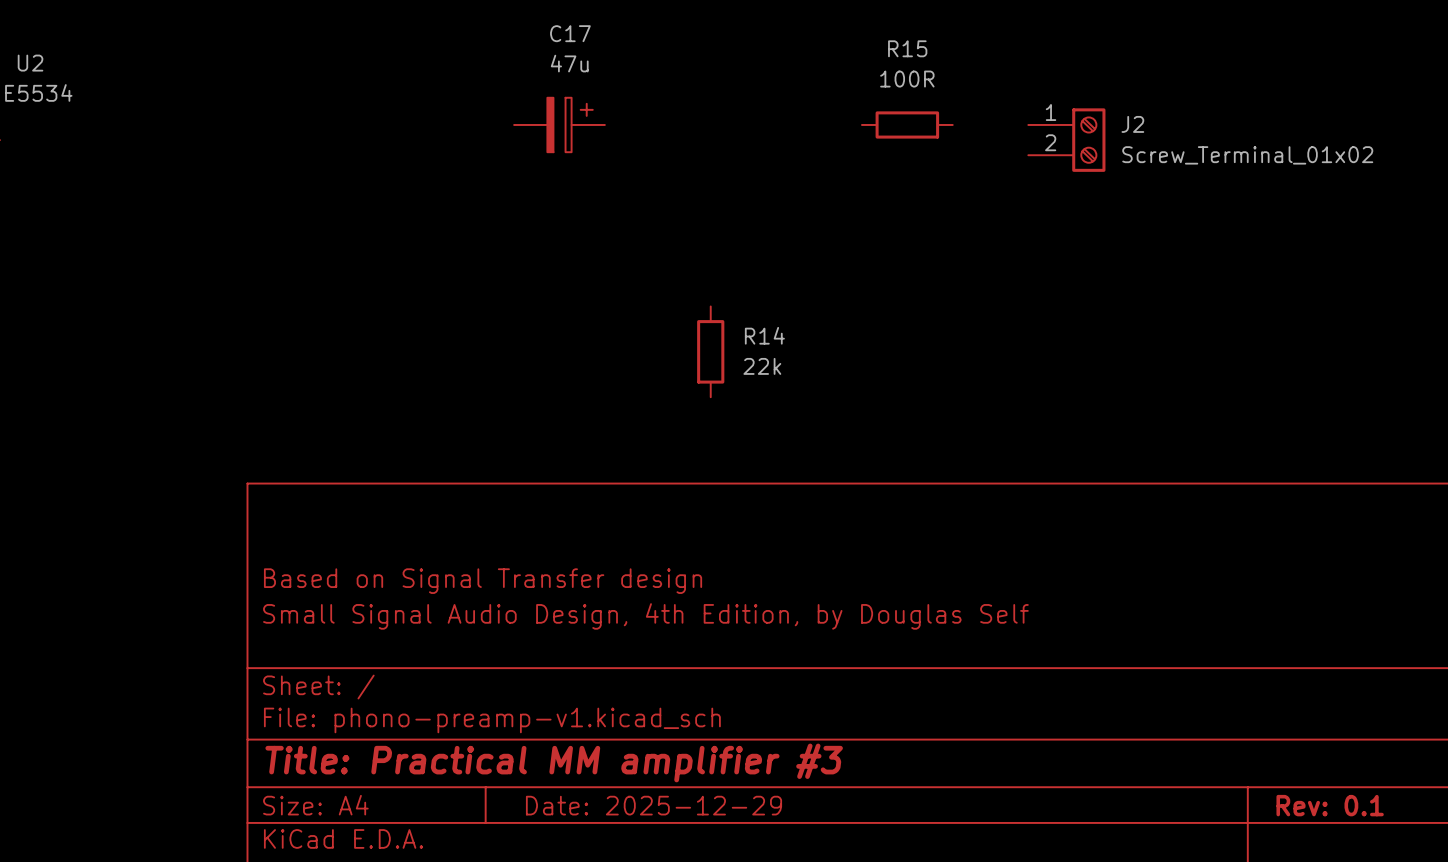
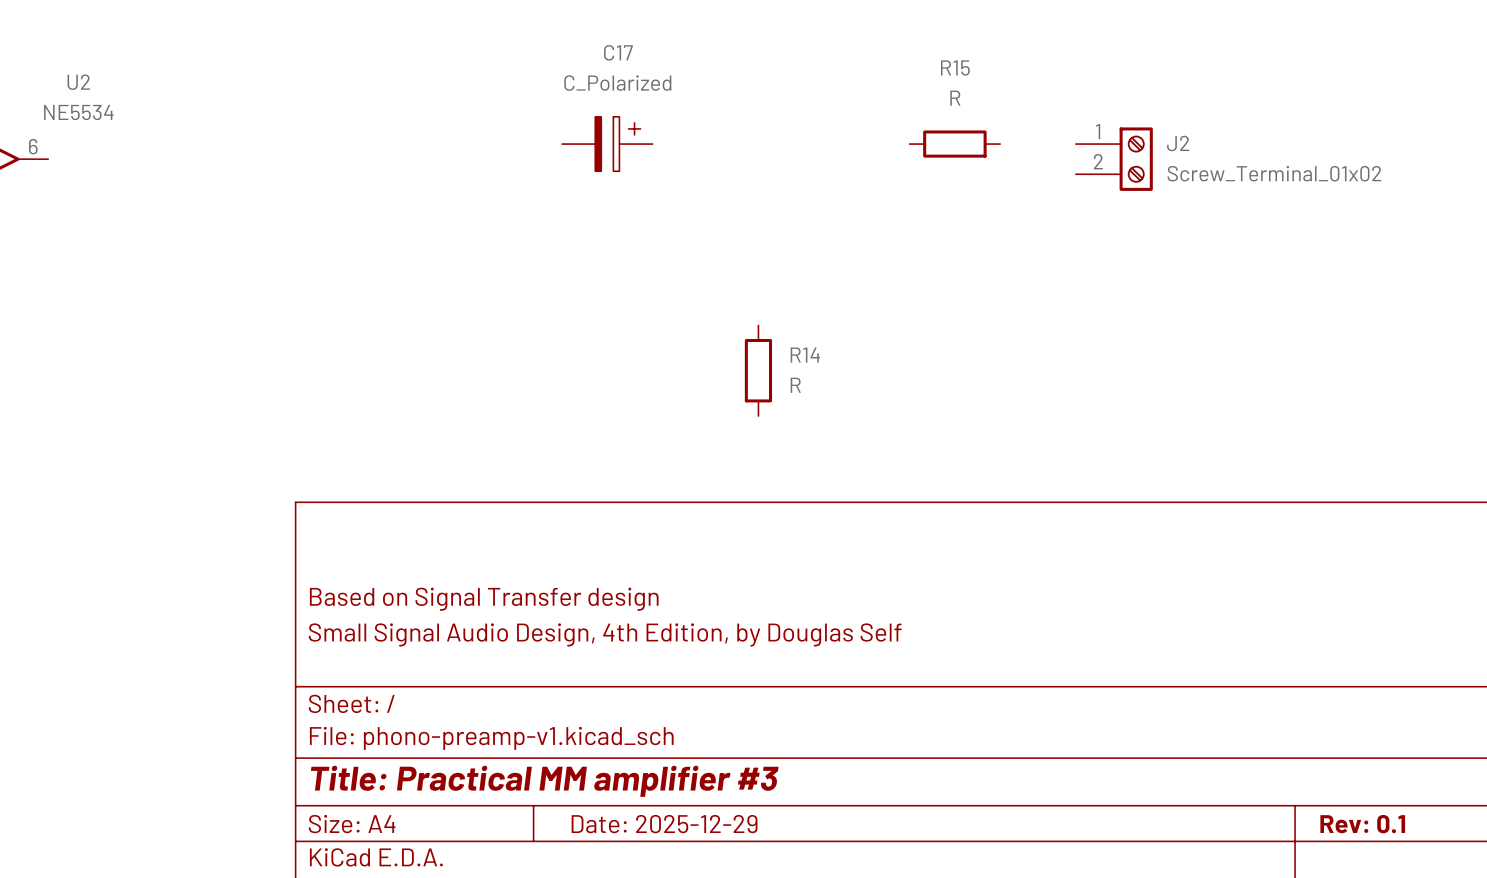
C17 value: 47u (569, 63) -> C_Polarized (617, 83)
R15 value: 100R (907, 79) -> R (955, 98)
R14 value: 22k (762, 366) -> R (795, 385)

